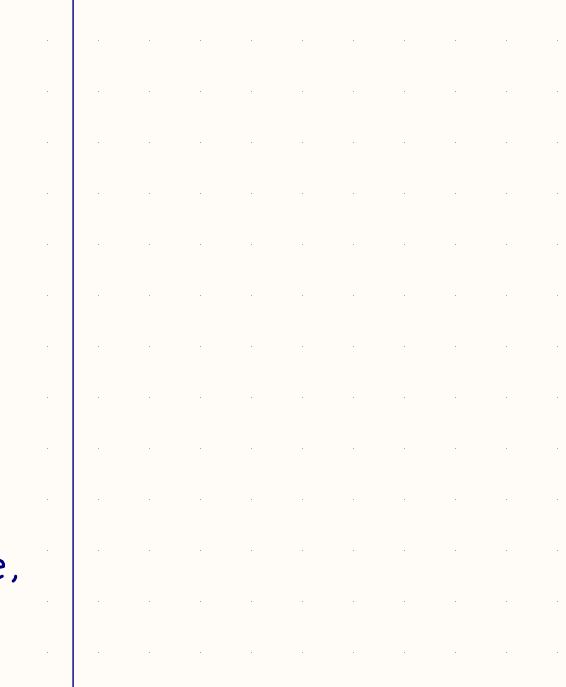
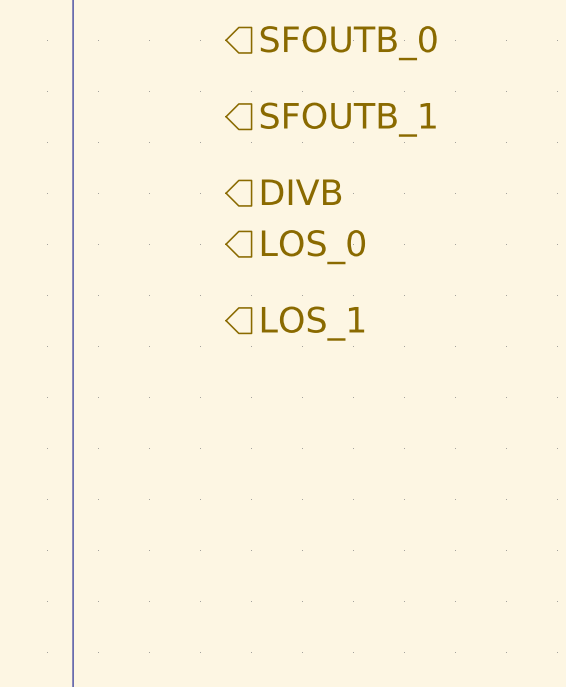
hierarchical label: none -> SFOUTB_0 (348, 43)
hierarchical label: none -> SFOUTB_1 (348, 119)
hierarchical label: none -> DIVB (301, 192)
hierarchical label: none -> LOS_0 (313, 247)
hierarchical label: none -> LOS_1 (313, 323)

